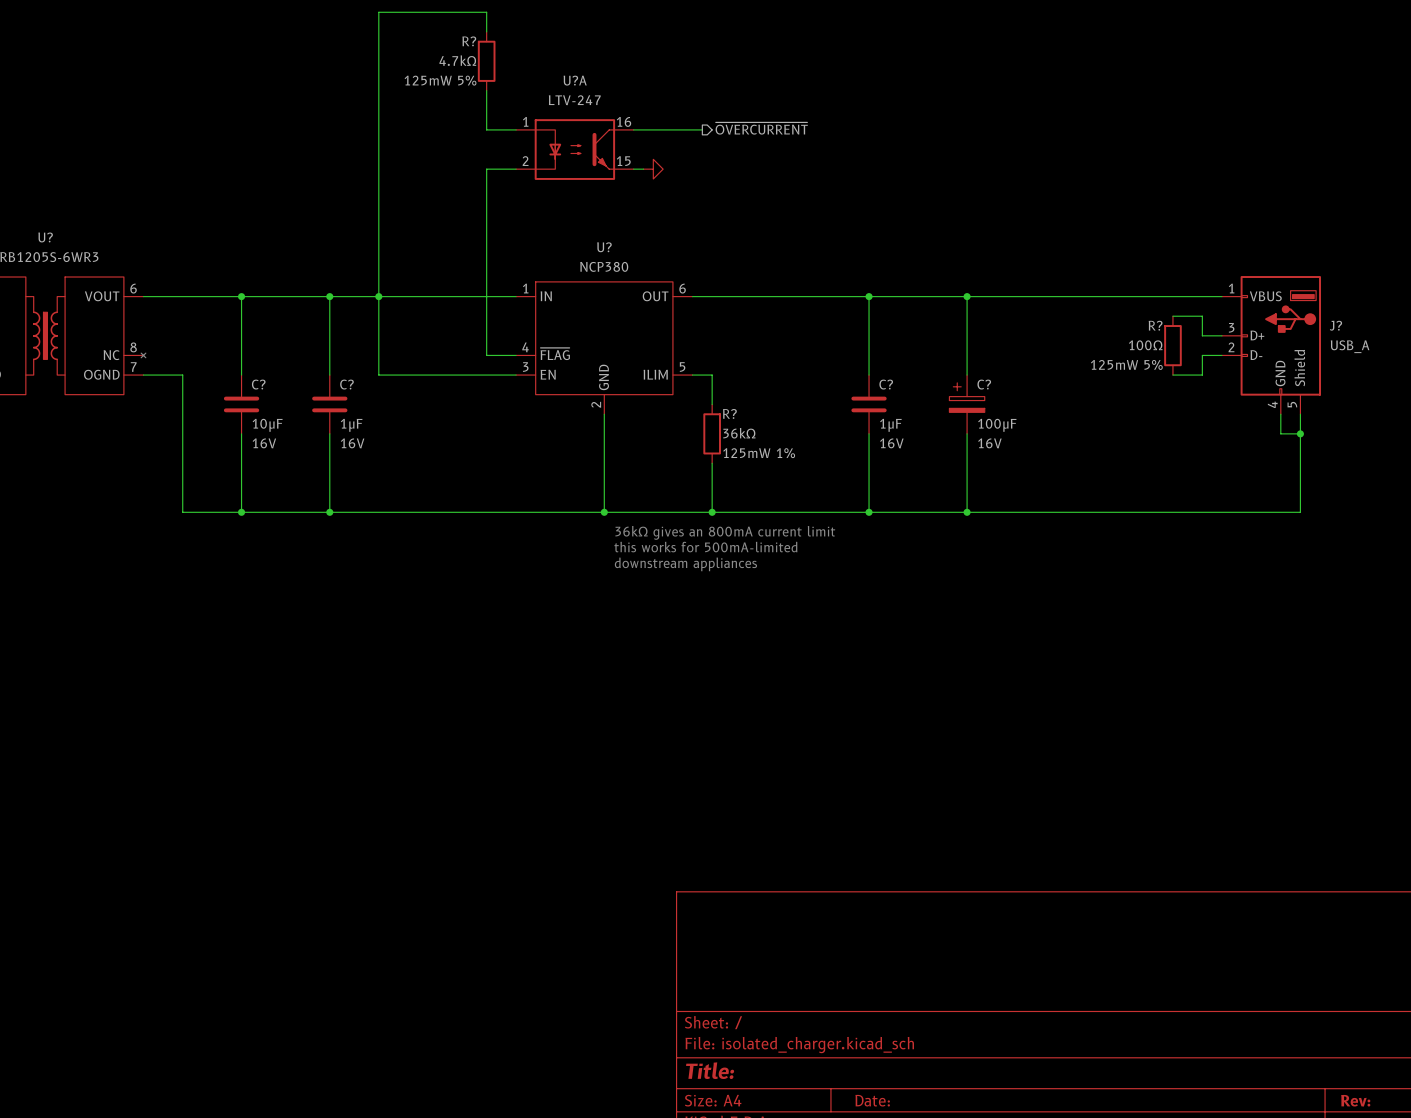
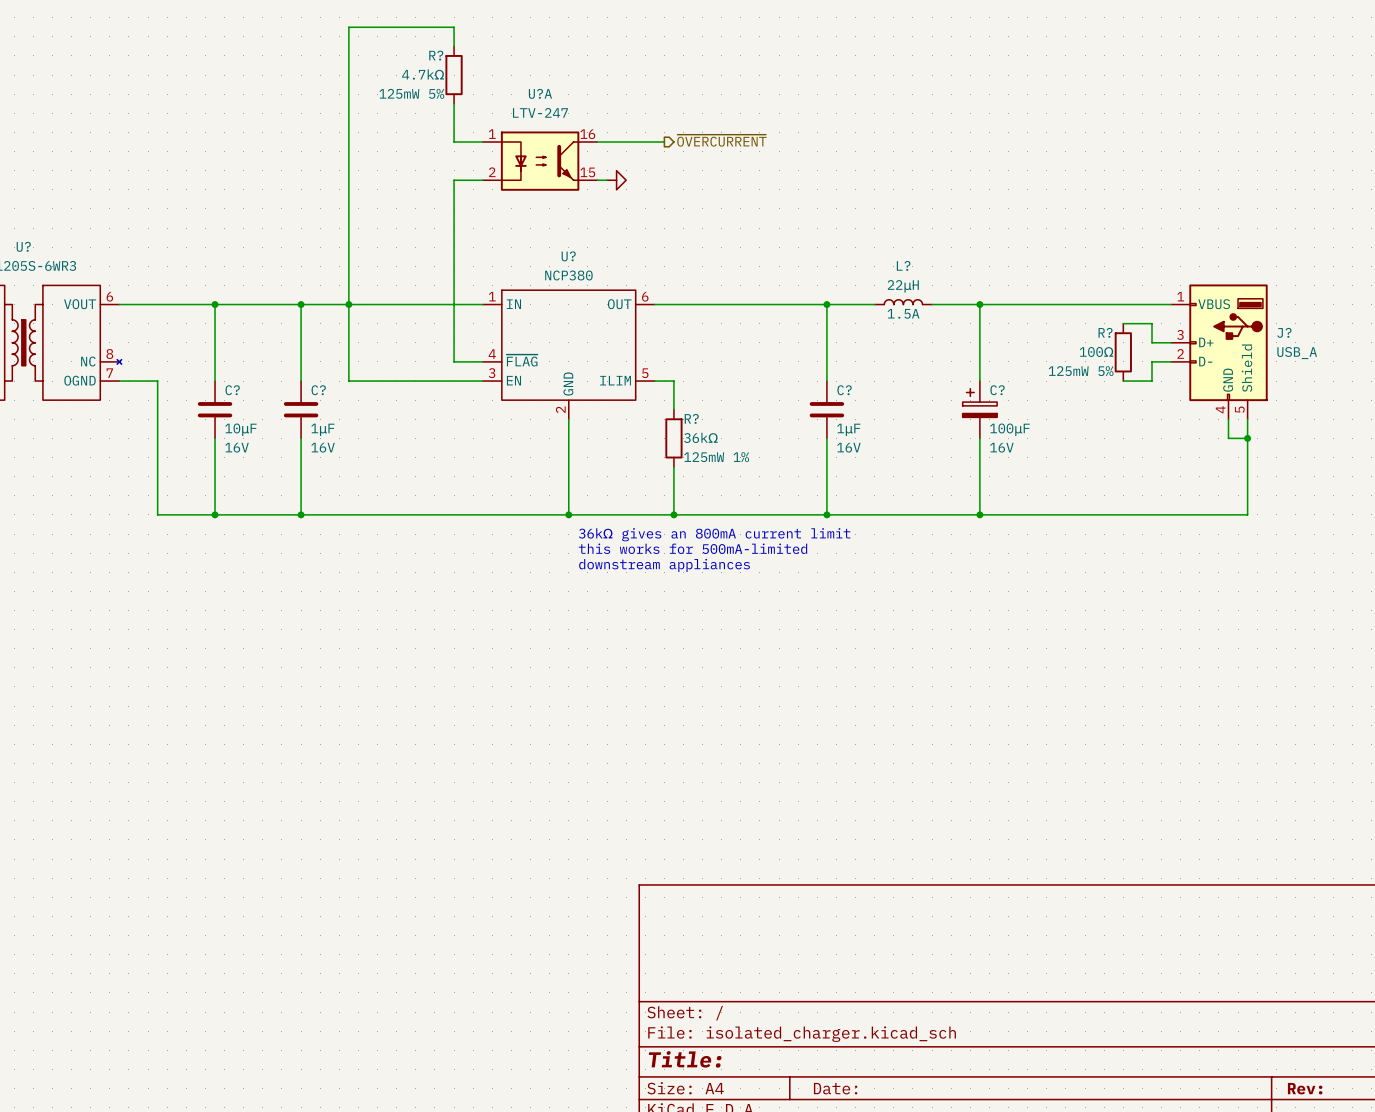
L?: none -> 22μH (903, 302)
wire: (918, 296) (976, 296) -> none
wire: (967, 296) (967, 375) -> (979, 304) (979, 381)
junction: (967, 296) -> none
junction: none -> (979, 304)
C? position: (967, 404) -> (979, 409)
wire: (967, 433) (967, 512) -> (979, 438) (979, 514)
junction: (967, 512) -> none
junction: none -> (979, 514)

